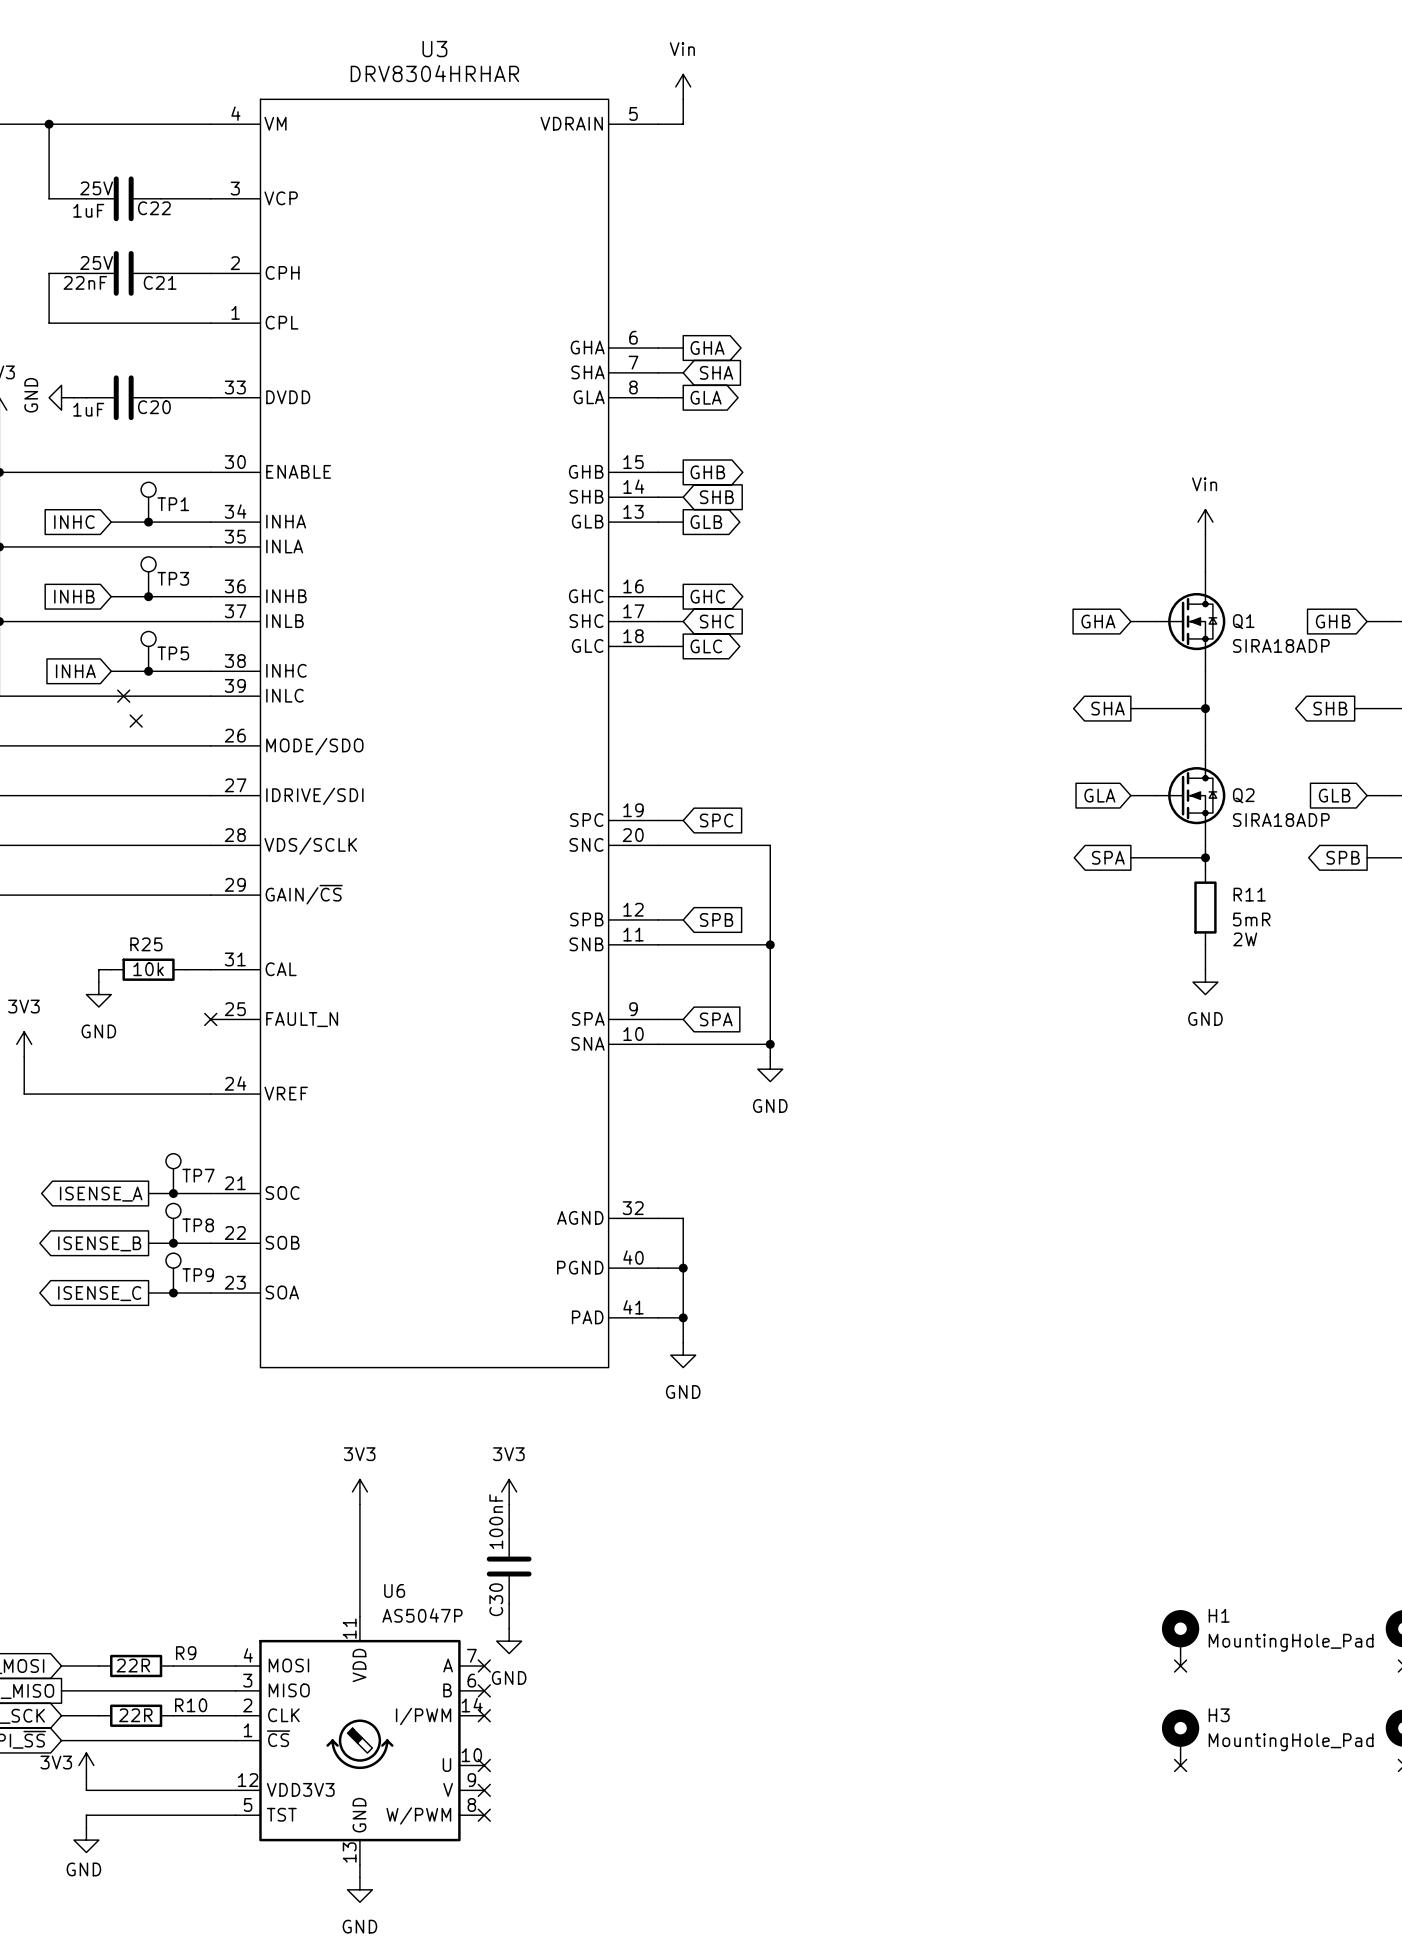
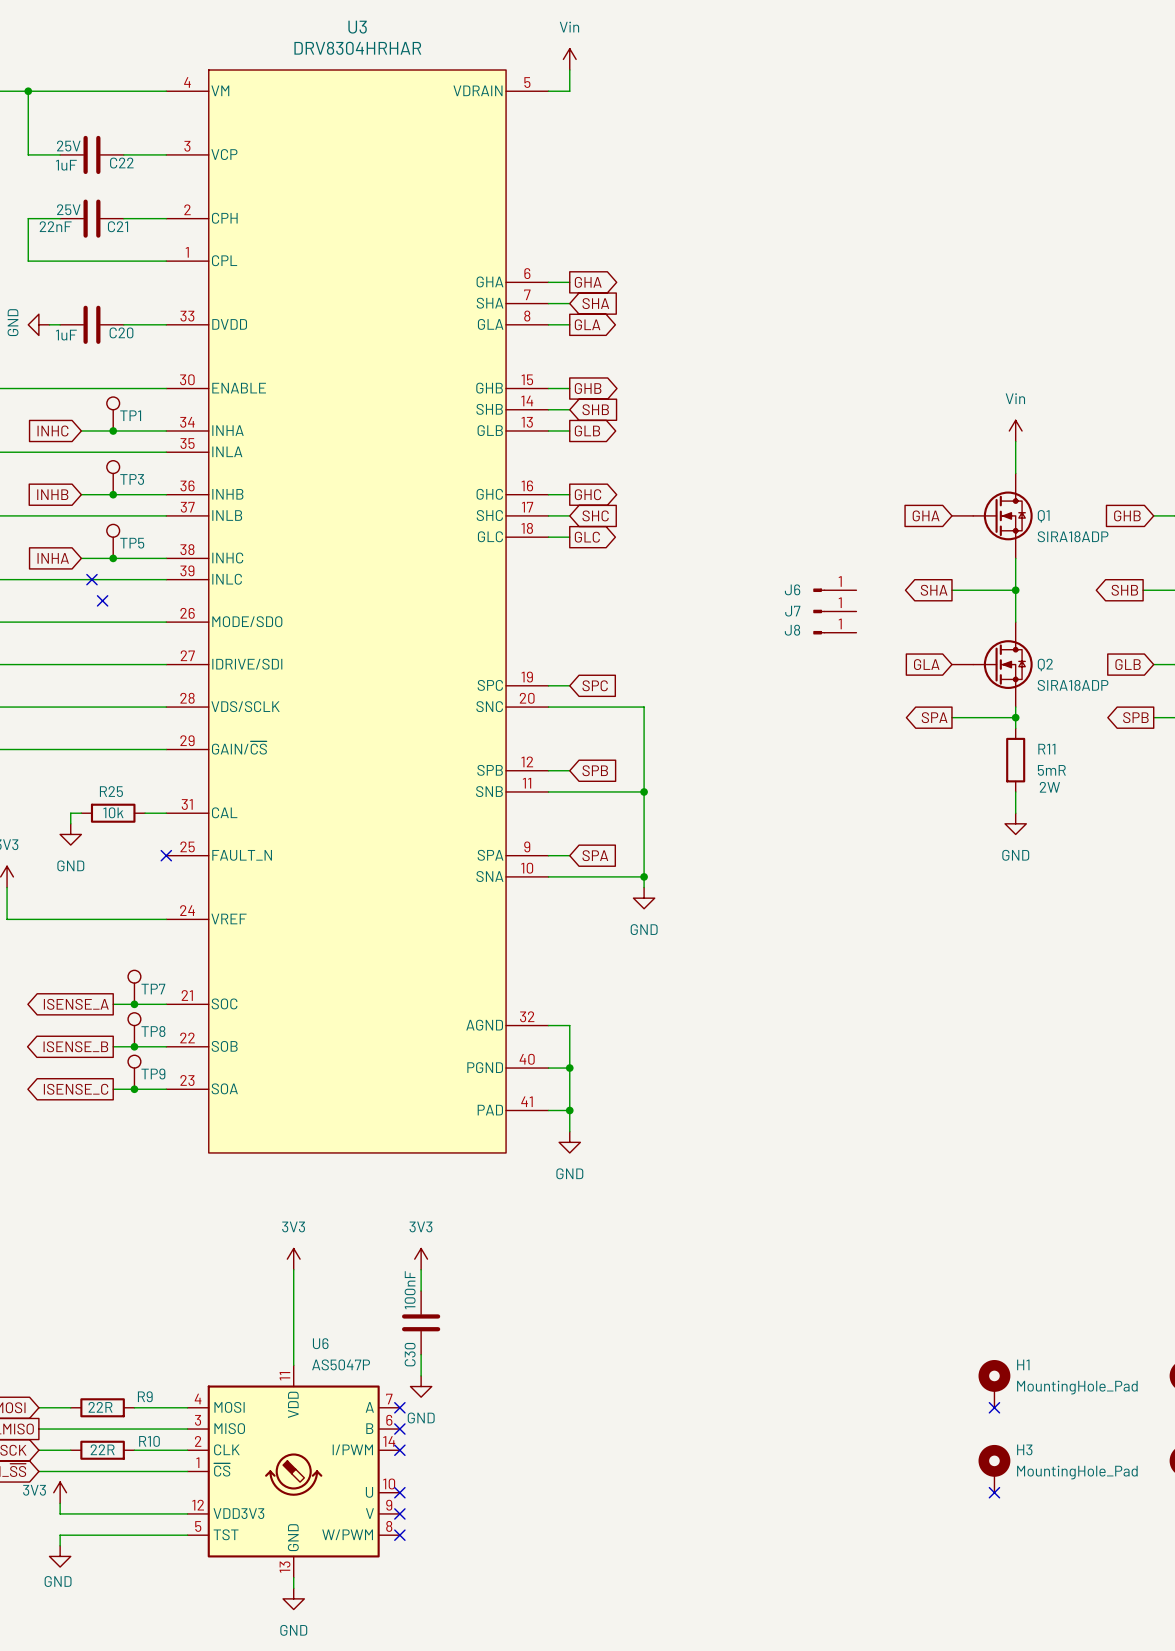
J6: none -> (834, 590)
J7: none -> (834, 611)
J8: none -> (834, 632)

